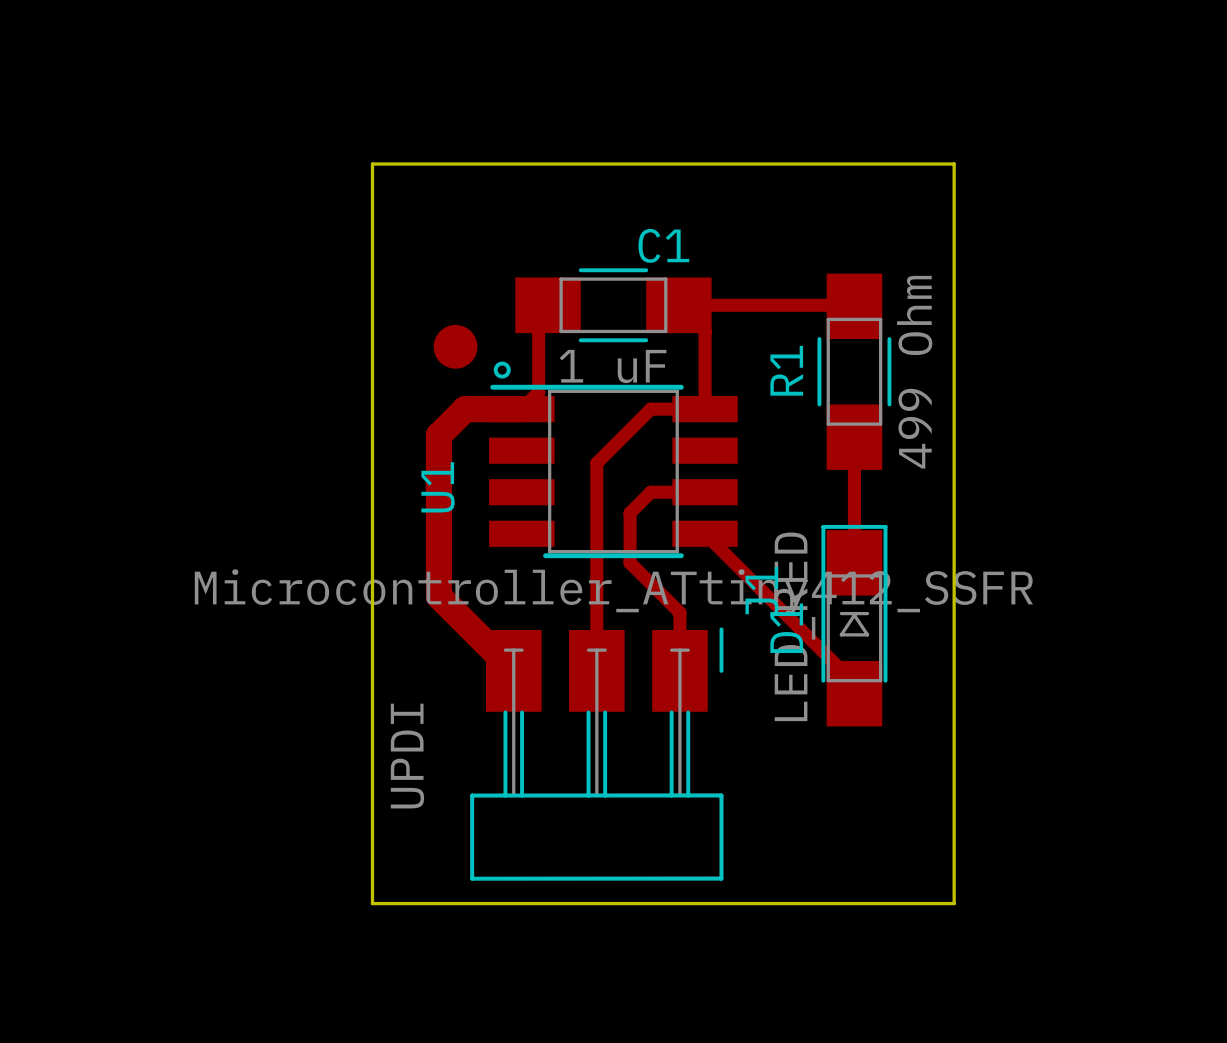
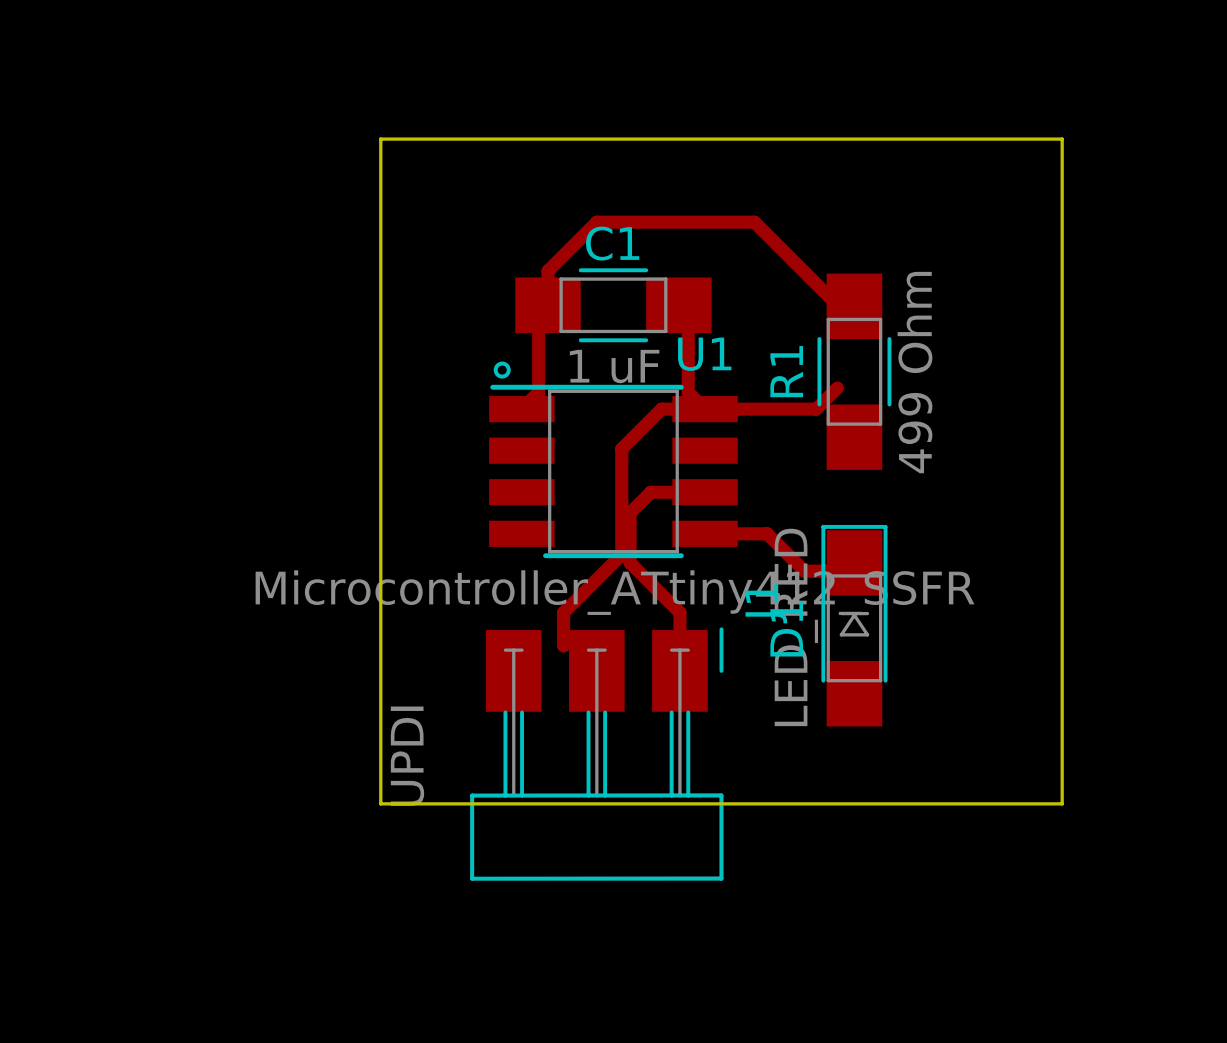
board edge: (372, 164) (954, 164) (954, 903) (372, 903) (372, 164) -> (380, 139) (380, 803) (1062, 803) (1062, 139) (380, 139)
C1 name position: C1 (663, 245) -> C1 (612, 243)
top track: none -> (837, 304) (754, 222) (596, 222) (548, 270) (548, 305)
top track: (678, 305) (854, 306) -> none
top track: (688, 314) (705, 331) (705, 409) -> (688, 314) (688, 392) (705, 409) (816, 409) (837, 388)
drawing: [433, 324, 478, 369] -> none
top track: (521, 409) (465, 409) (438, 435) (438, 596) (513, 670) -> none
top track: (661, 409) (650, 409) (596, 463) (596, 670) -> (661, 409) (621, 448) (621, 554) (563, 612) (563, 645)
top track: (854, 437) (854, 562) -> none
U1 name rotation: 0° (438, 487) -> 90° clockwise (704, 354)
U1 name position: U1 (438, 487) -> U1 (704, 354)
top track: (705, 533) (854, 683) (854, 693) -> (705, 533) (767, 533) (804, 571) (871, 571)

